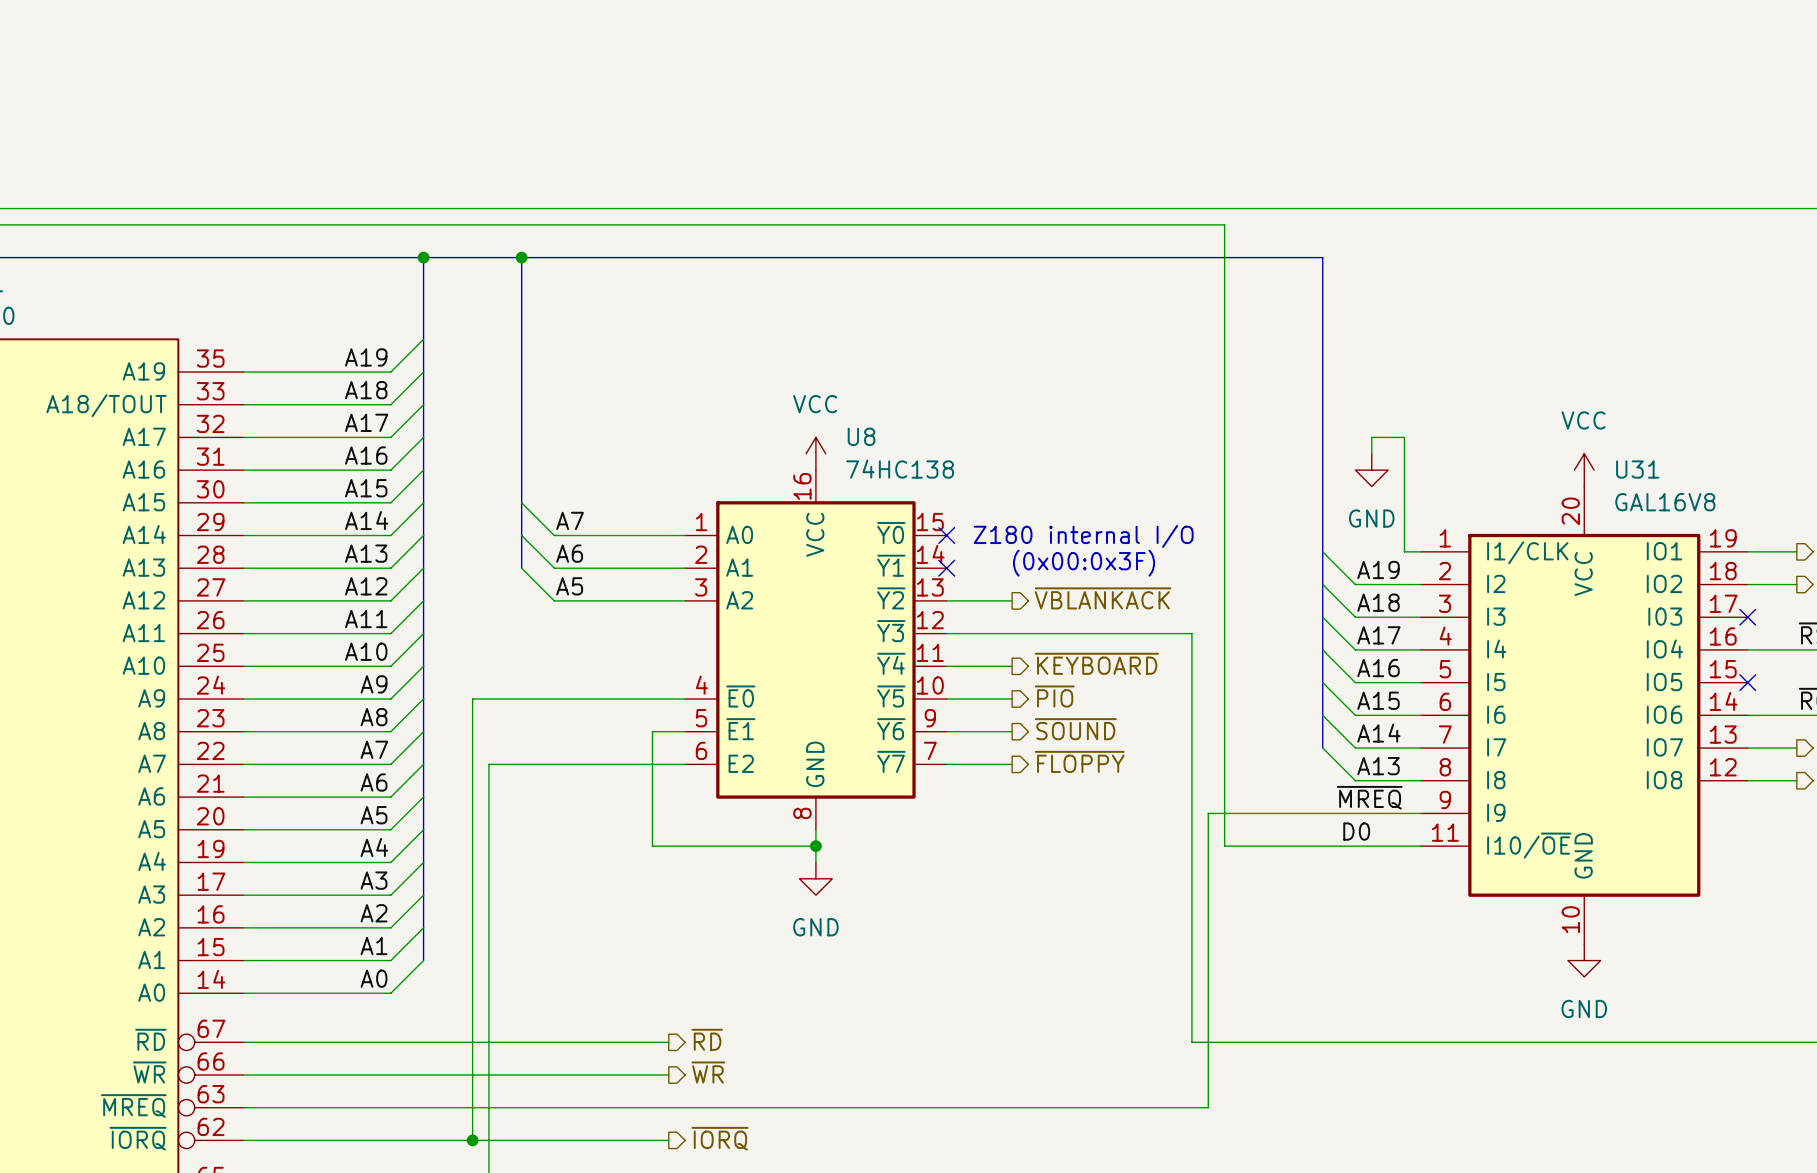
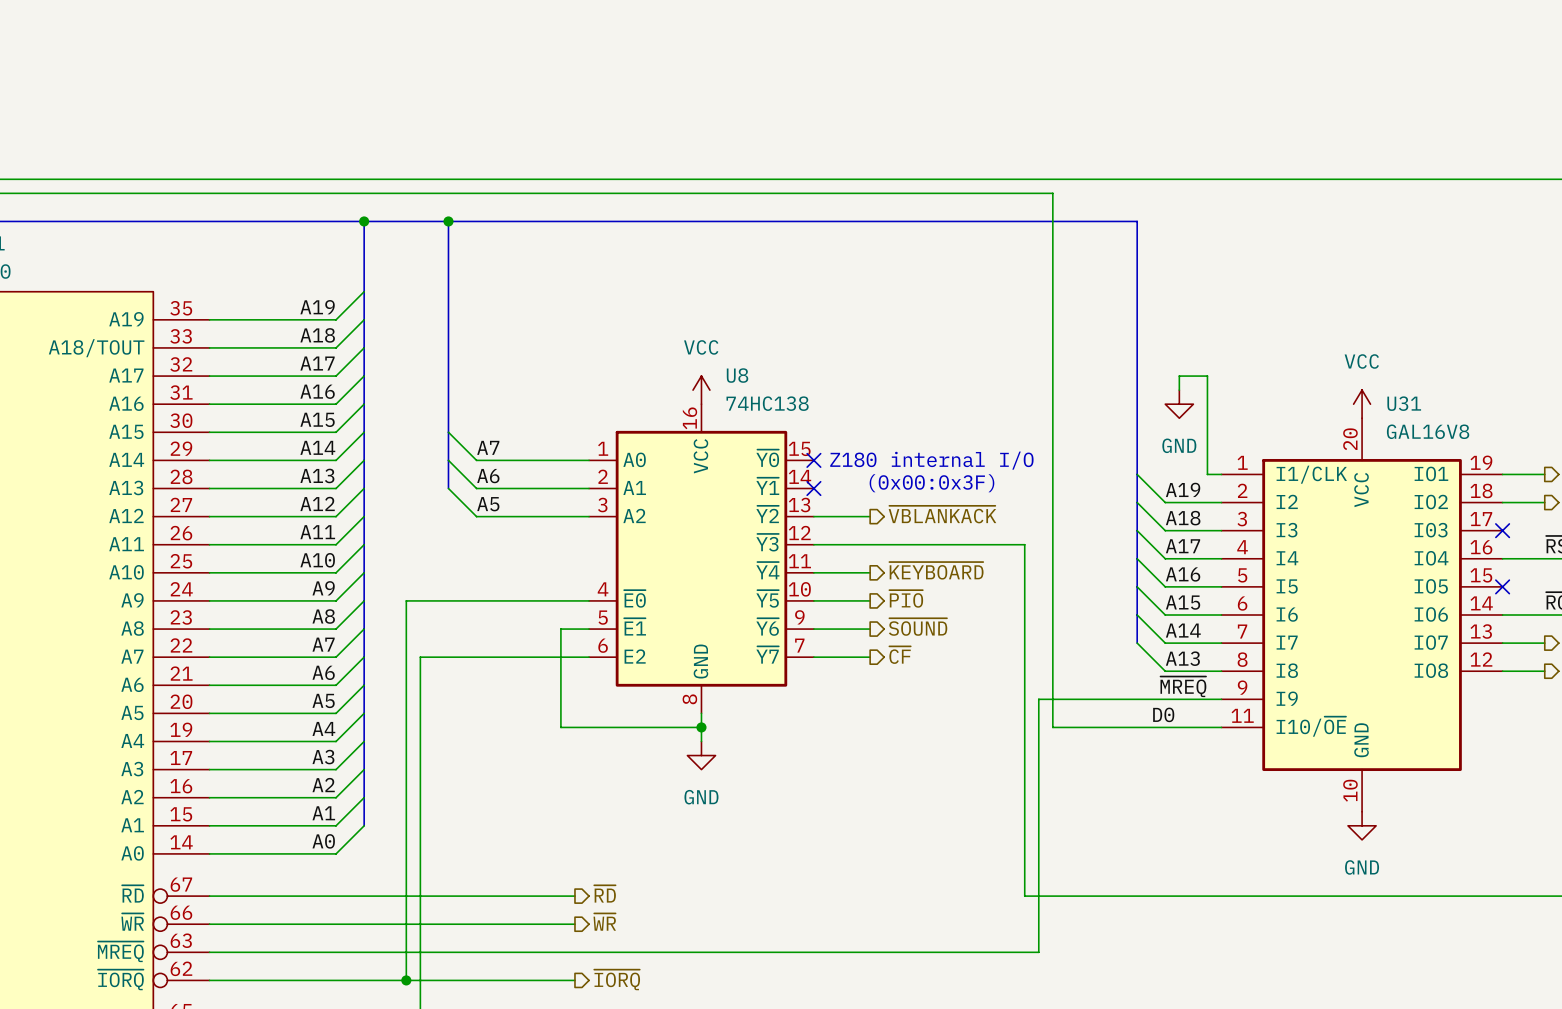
hierarchical label: ~{FLOPPY} (1079, 761) -> ~{CF} (900, 655)

